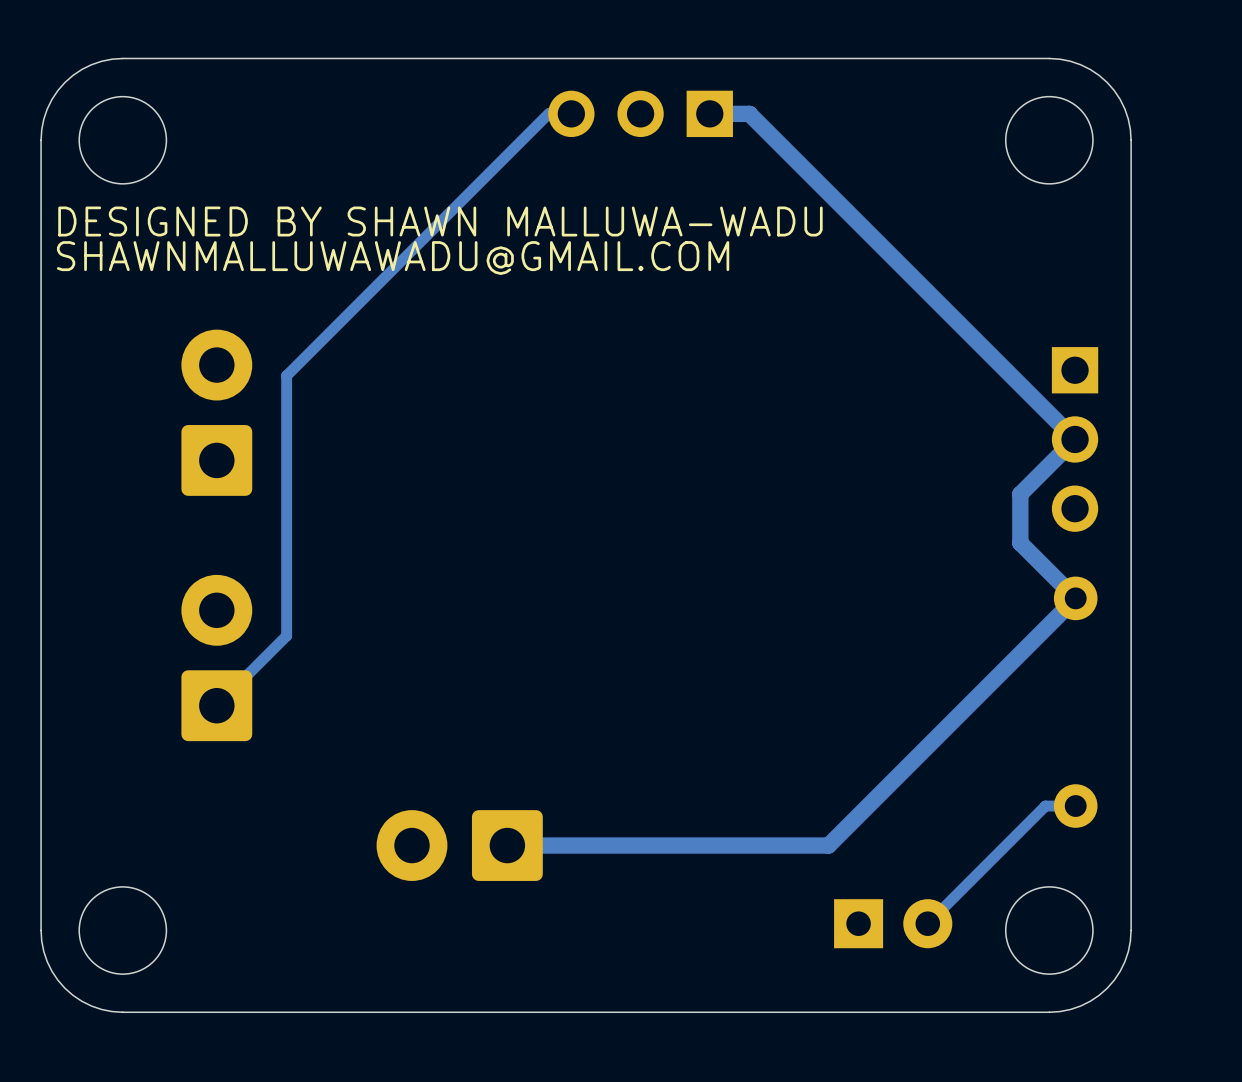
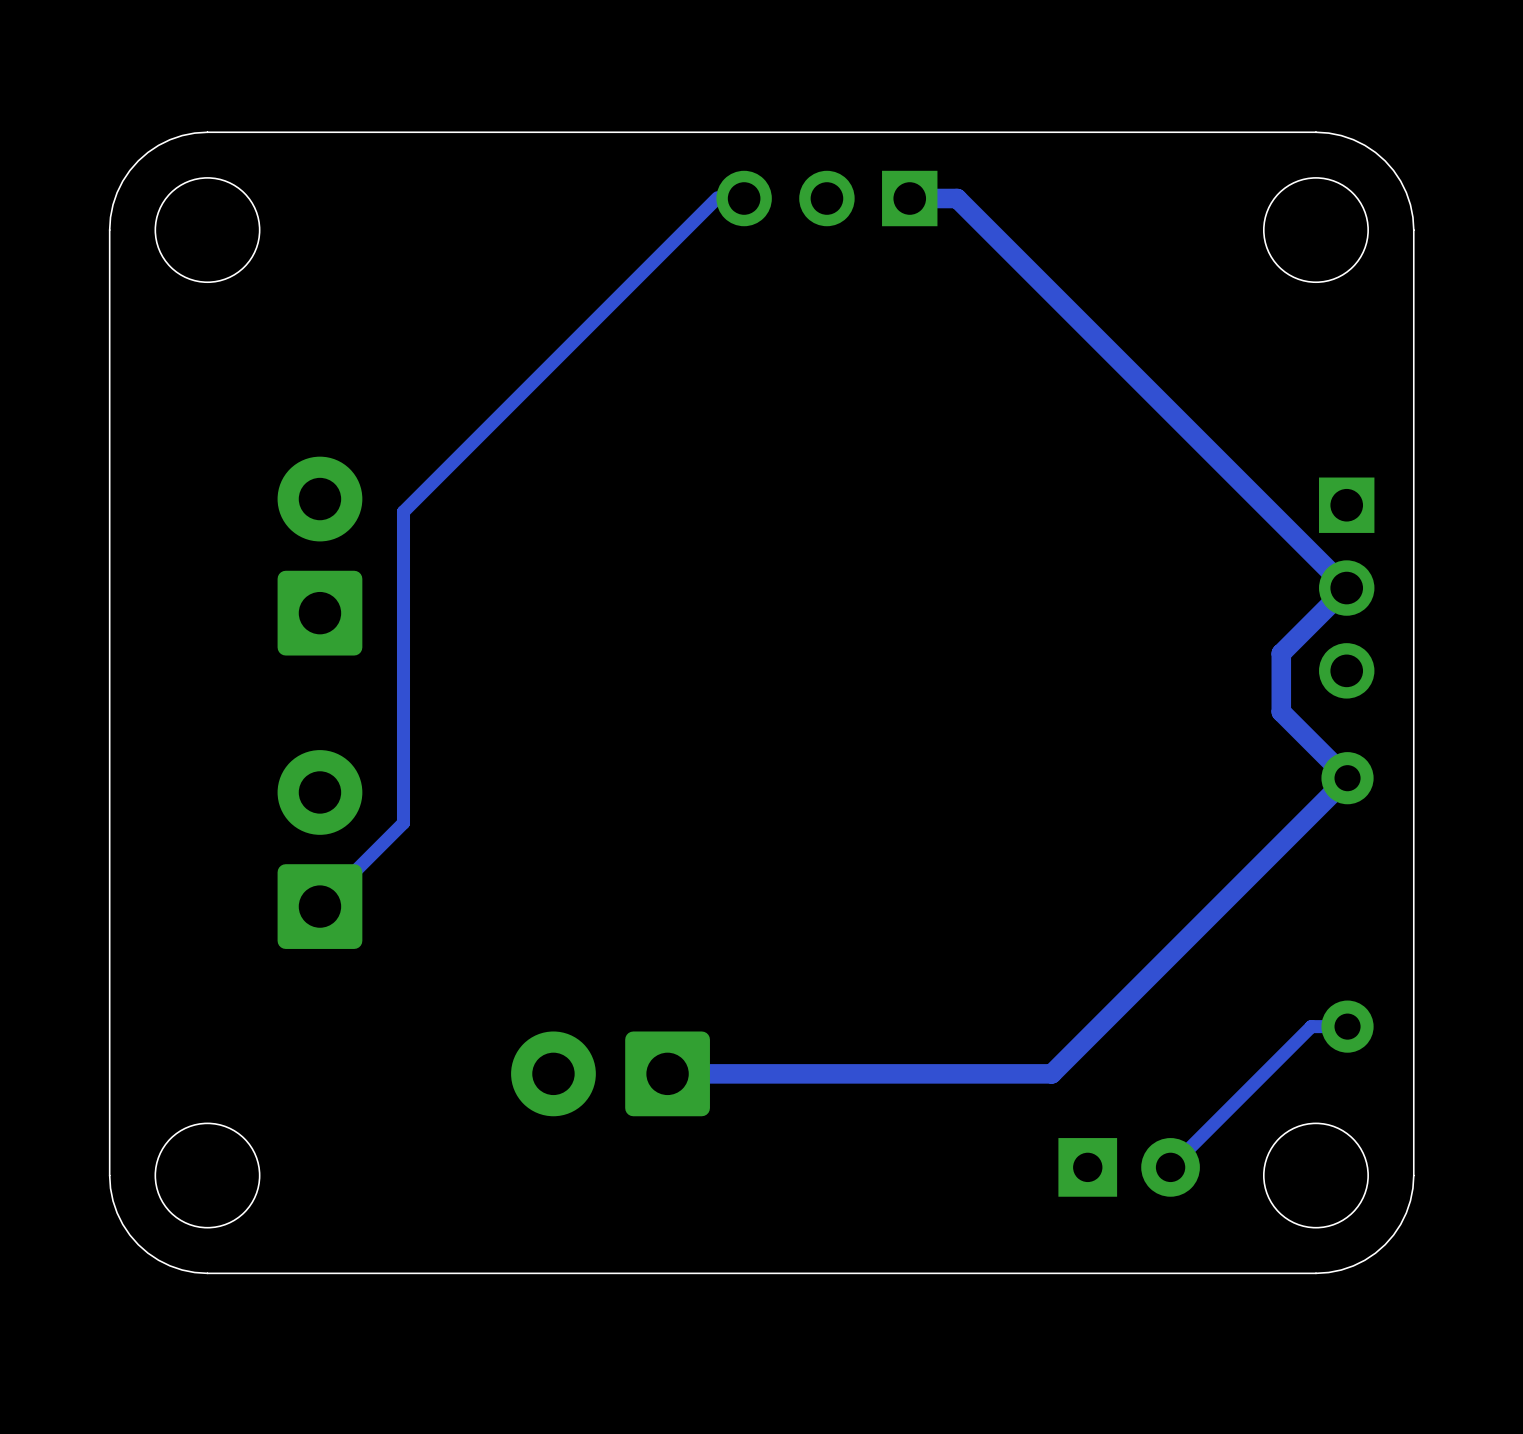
text: DESIGNED BY SHAWN MALLUWA-WADU (440, 221) -> none
text: SHAWNMALLUWAWADU@GMAIL.COM (393, 258) -> none

